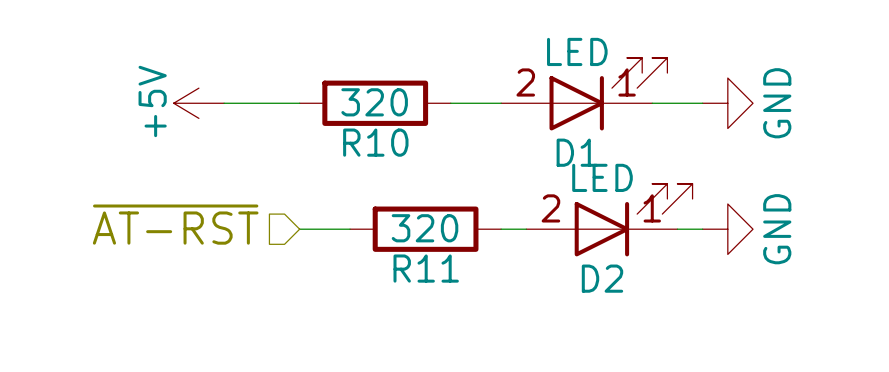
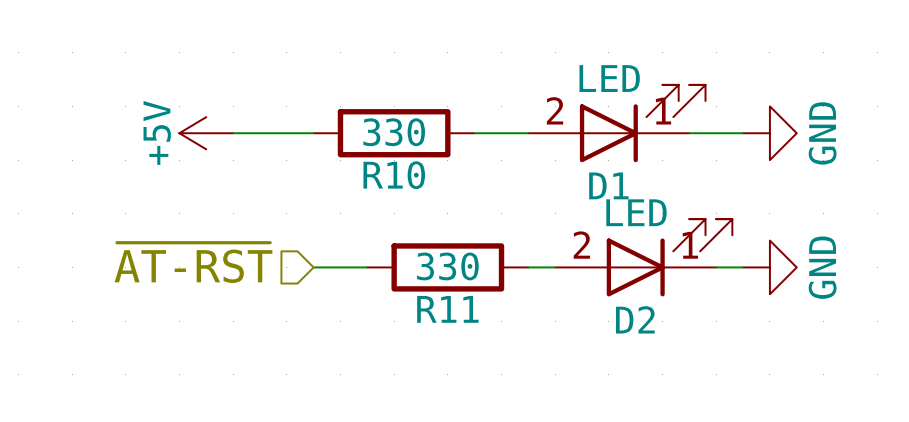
R10 value: 320 (374, 102) -> 330 (394, 132)
R11 value: 320 (424, 228) -> 330 (447, 266)

